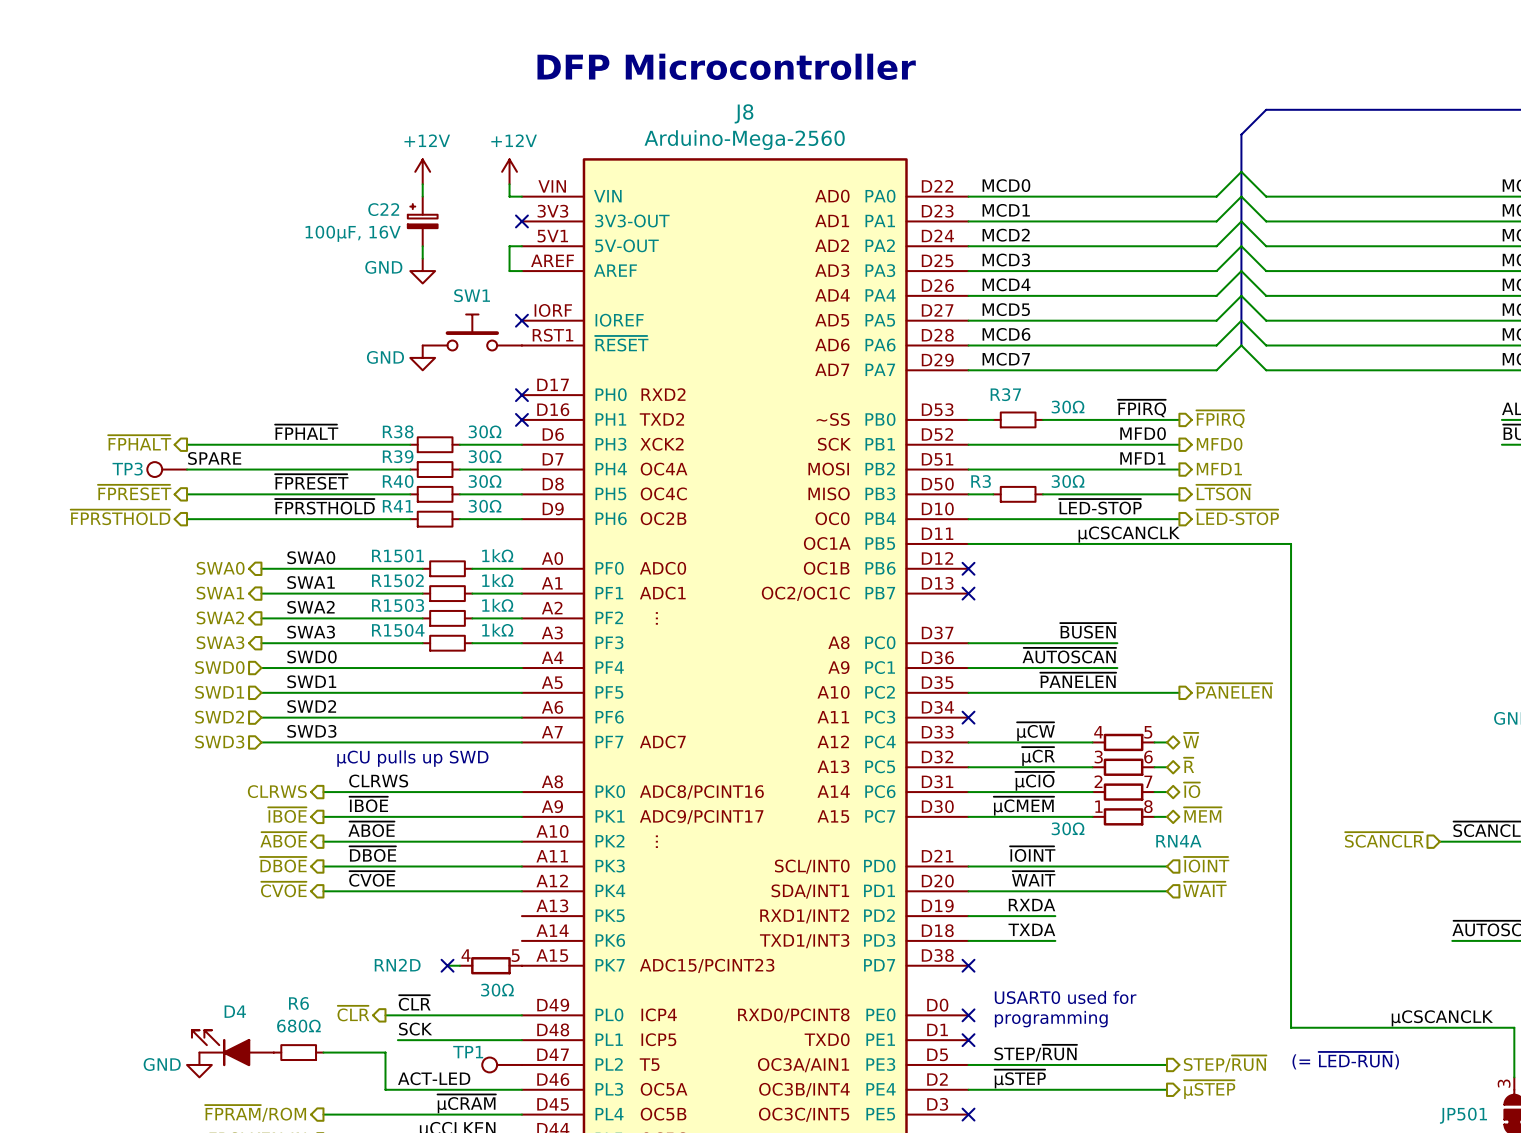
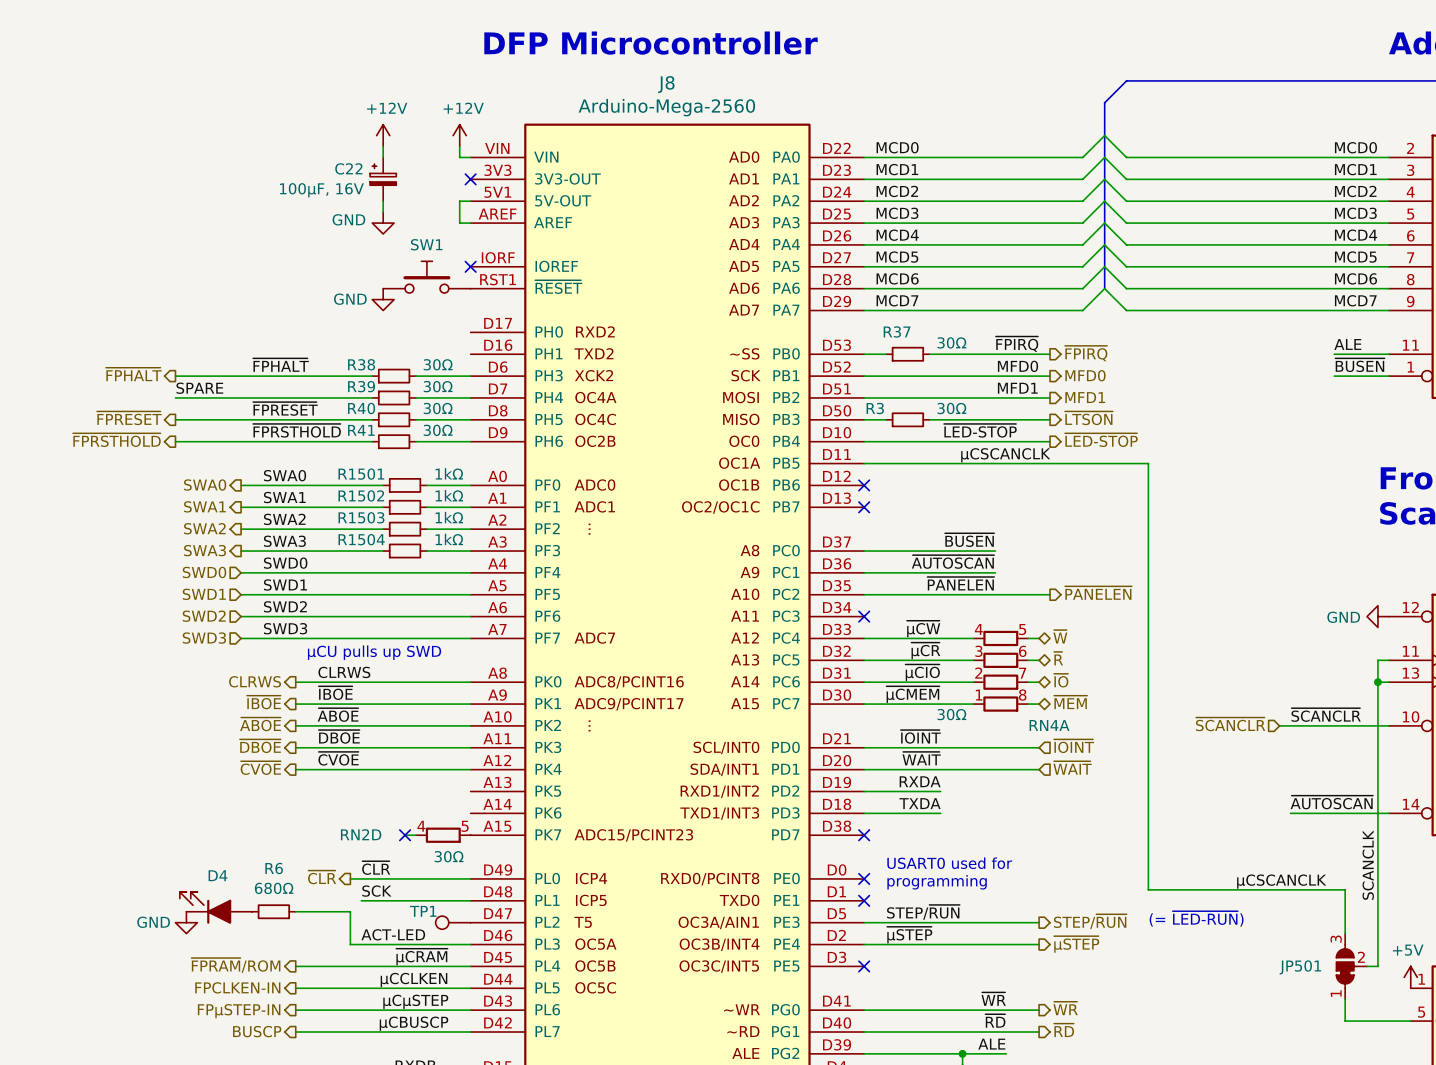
no-connect mark: (521, 395) -> none
no-connect mark: (521, 419) -> none
TP3: (167, 469) -> none

